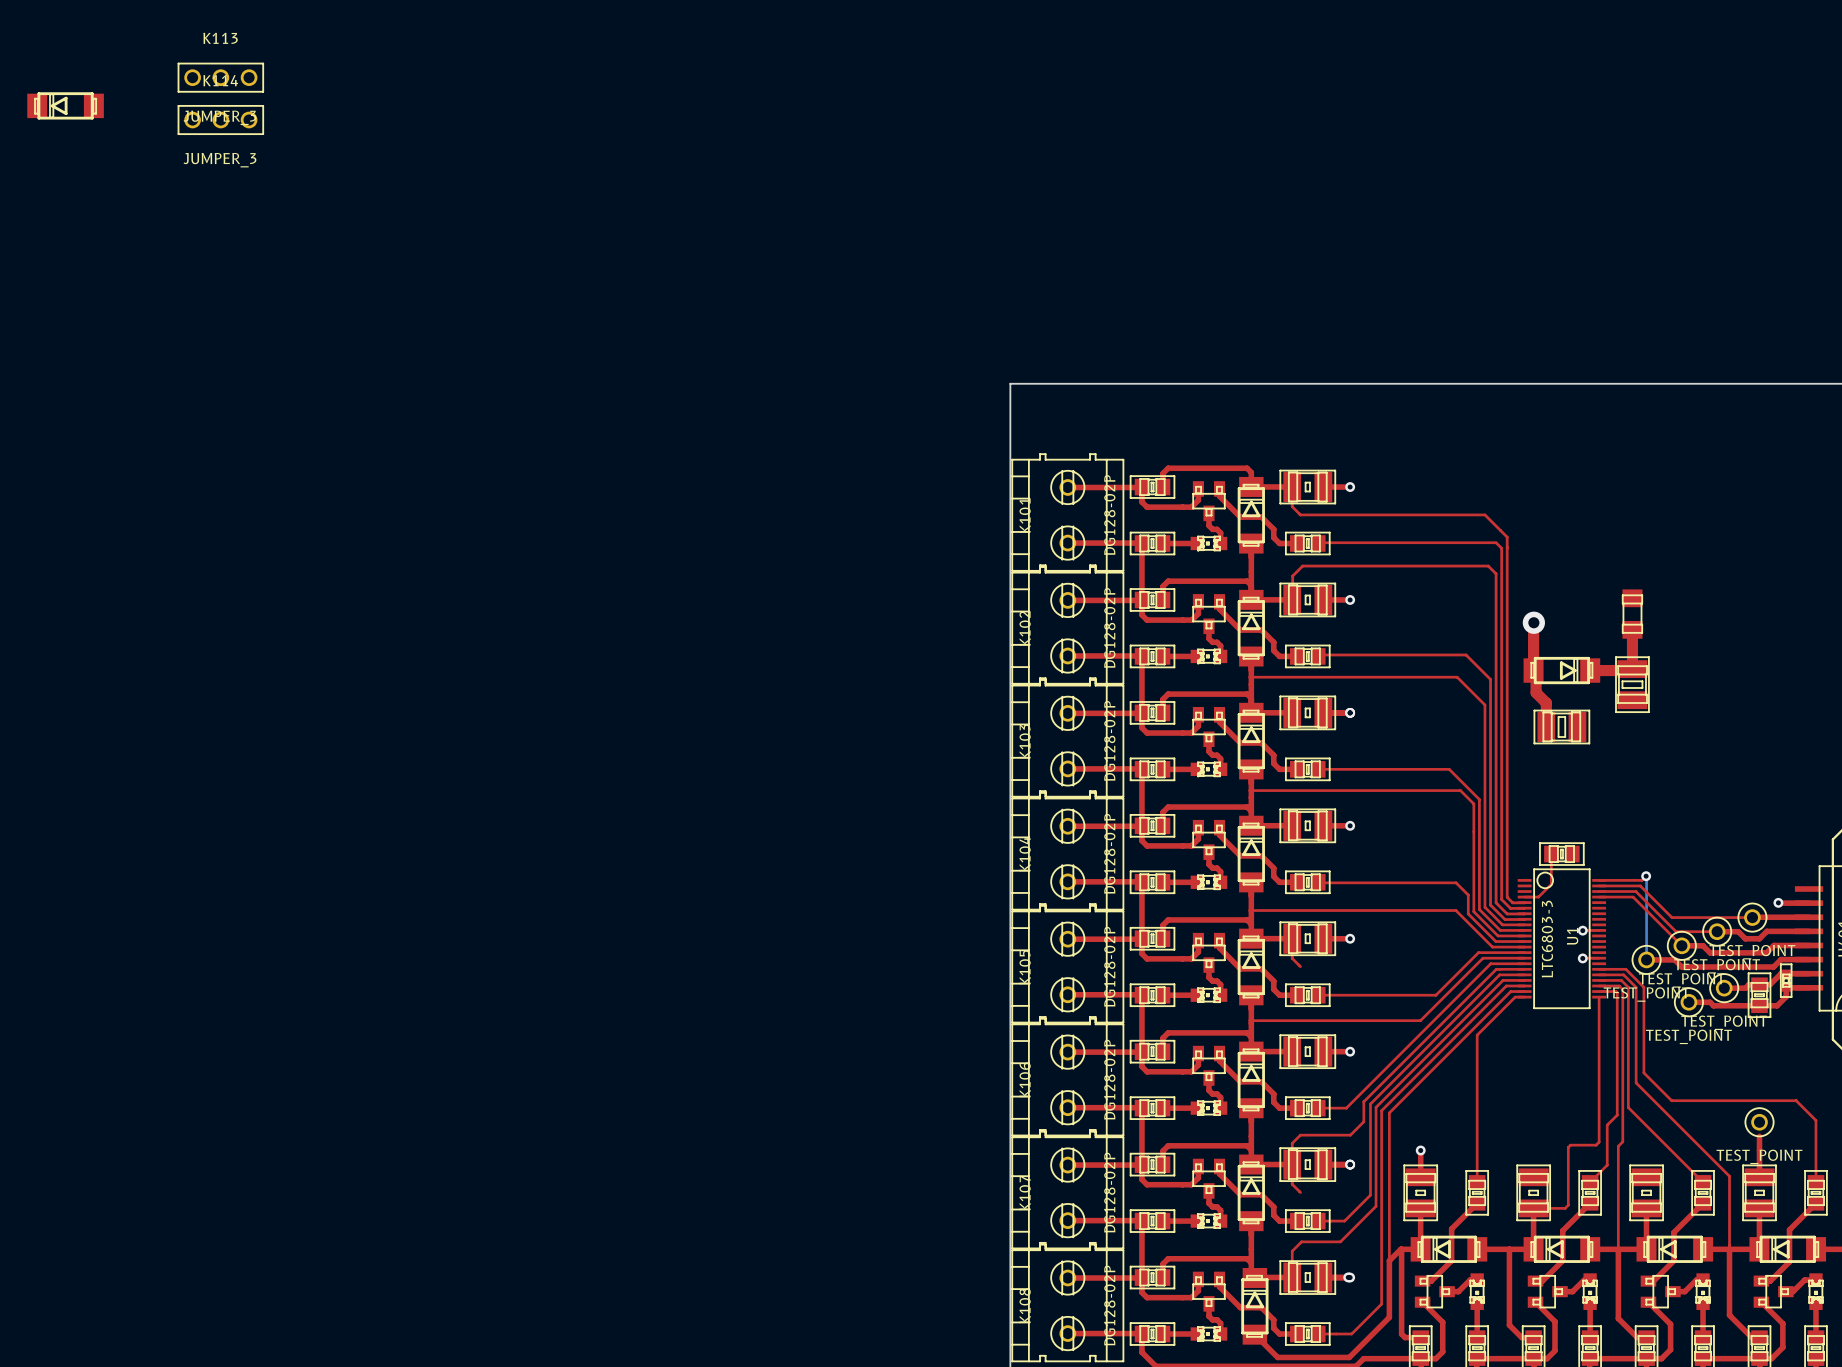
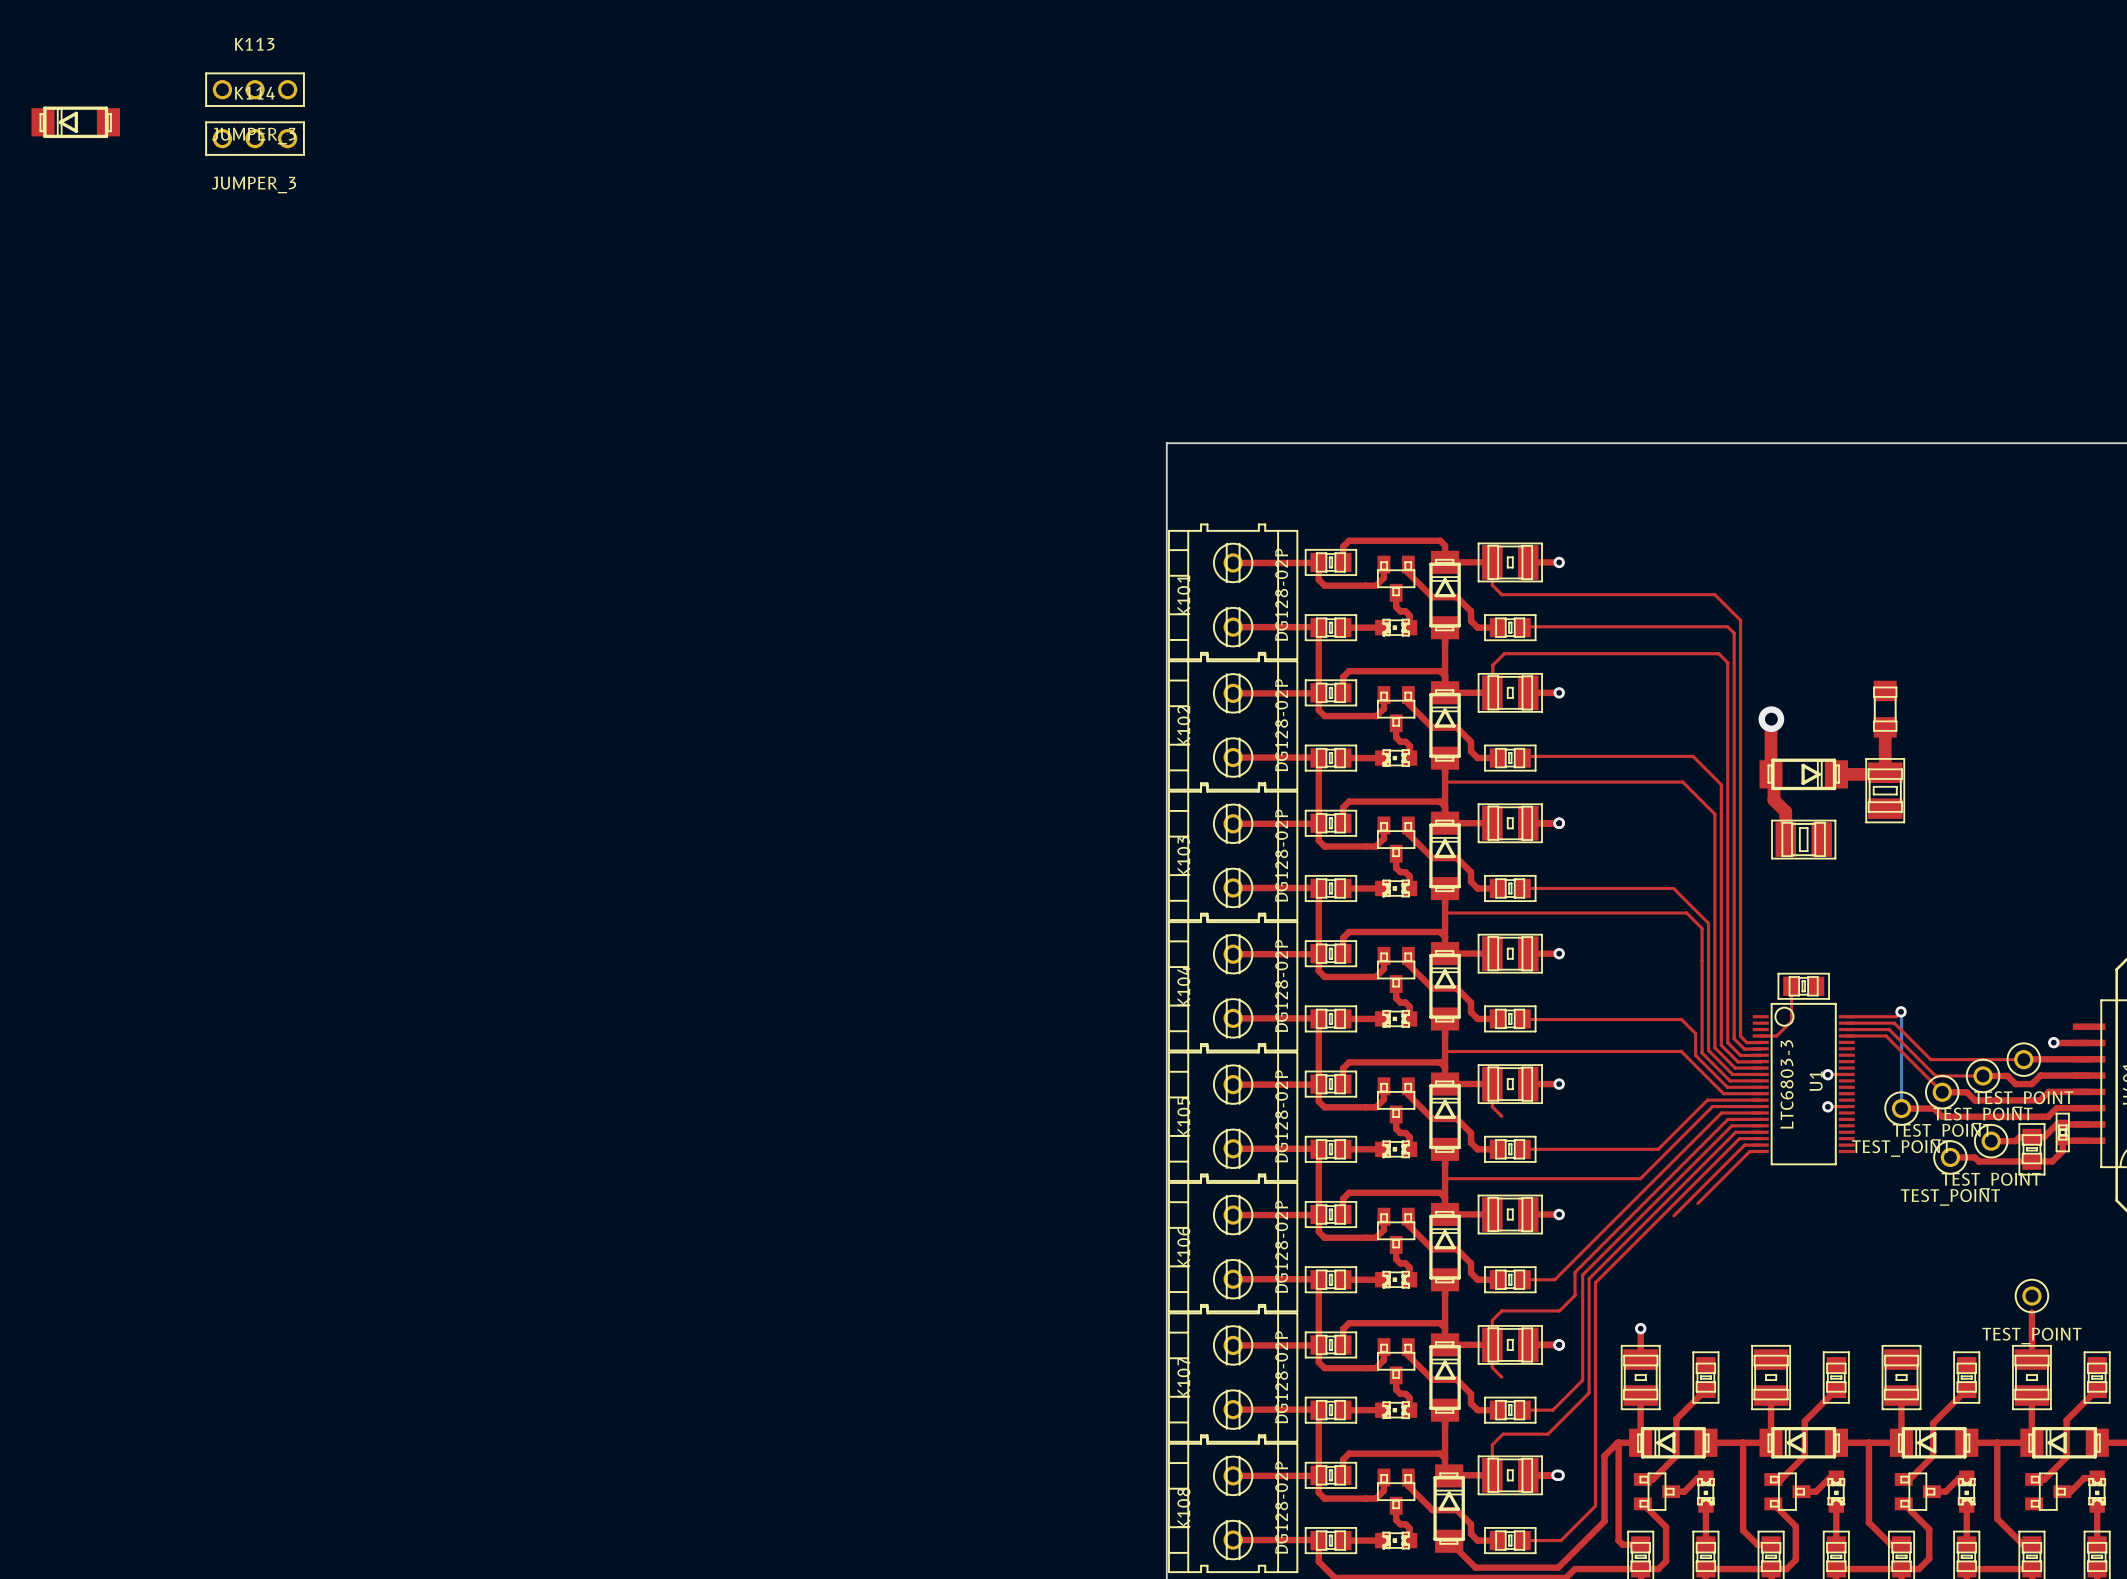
top track: (1599, 969) (1625, 969) (1643, 987) (1643, 1072) (1671, 1100) (1796, 1100) (1815, 1120) (1815, 1182) -> none
top track: (1599, 974) (1623, 974) (1636, 987) (1636, 1082) (1729, 1176) (1729, 1249) -> none
top track: (1599, 980) (1621, 980) (1628, 987) (1628, 1107) (1703, 1182) -> none
top track: (1599, 985) (1619, 985) (1622, 989) (1622, 1141) (1618, 1146) (1618, 1249) -> none
top track: (1599, 991) (1617, 992) (1617, 1115) (1607, 1125) (1607, 1165) (1590, 1182) -> none
top track: (1599, 997) (1599, 1142) (1596, 1145) (1570, 1145) (1568, 1147) (1568, 1205) (1565, 1208) (1533, 1208) -> none
top track: (1477, 1035) (1477, 1182) -> (1705, 1195) (1697, 1203)
top track: (1449, 1052) (1389, 1112) (1389, 1260) -> none
top track: (1761, 1302) (1782, 1323) (1782, 1347) (1771, 1358) (1759, 1358) -> none

